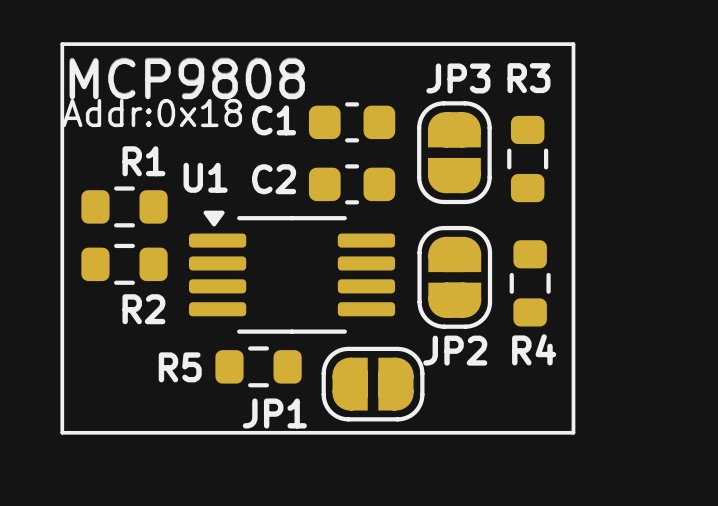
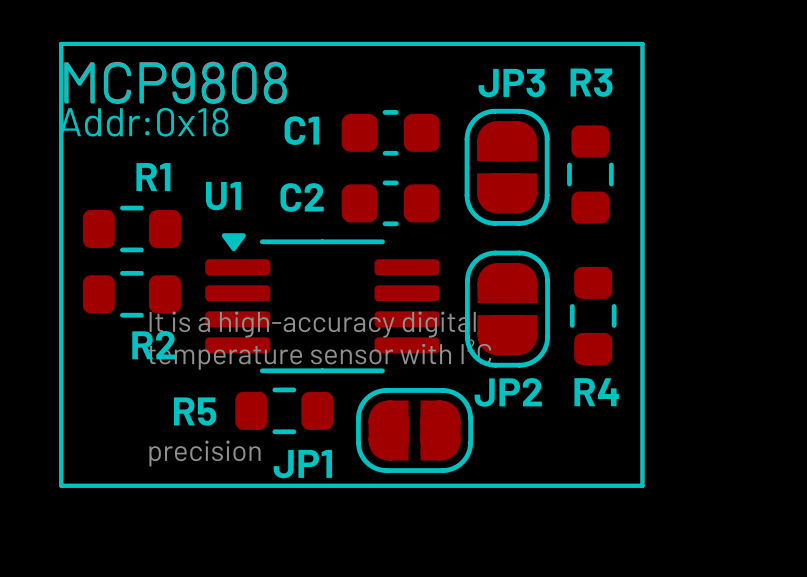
text: none -> It is a high-accuracy digital (312, 324)
text: none -> temperature sensor with I²C (319, 354)
text: none -> precision (204, 453)

